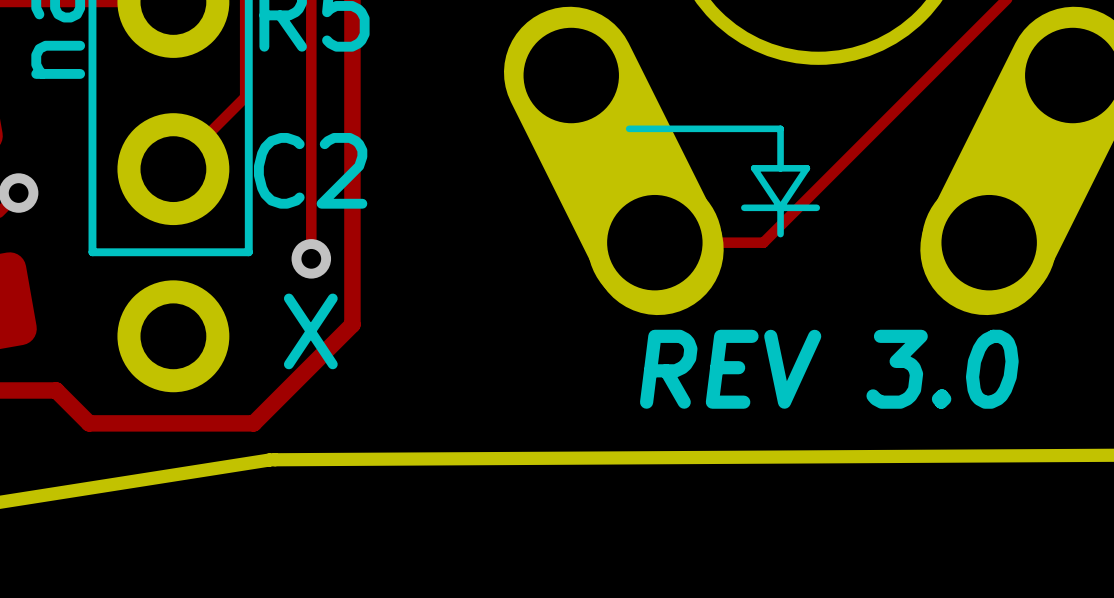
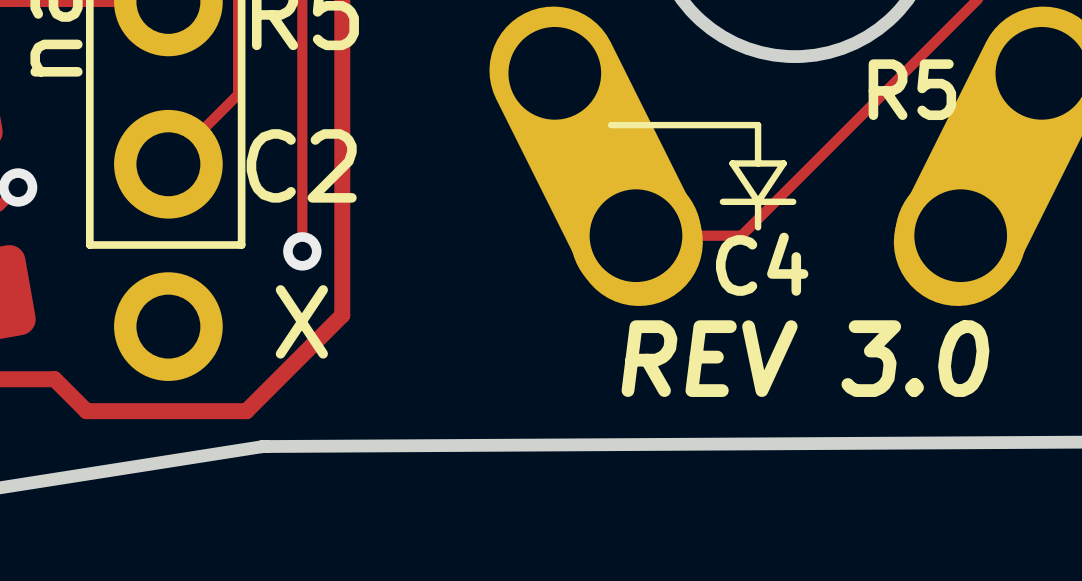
text: none -> R5 (912, 89)
text: none -> C4 (762, 264)

